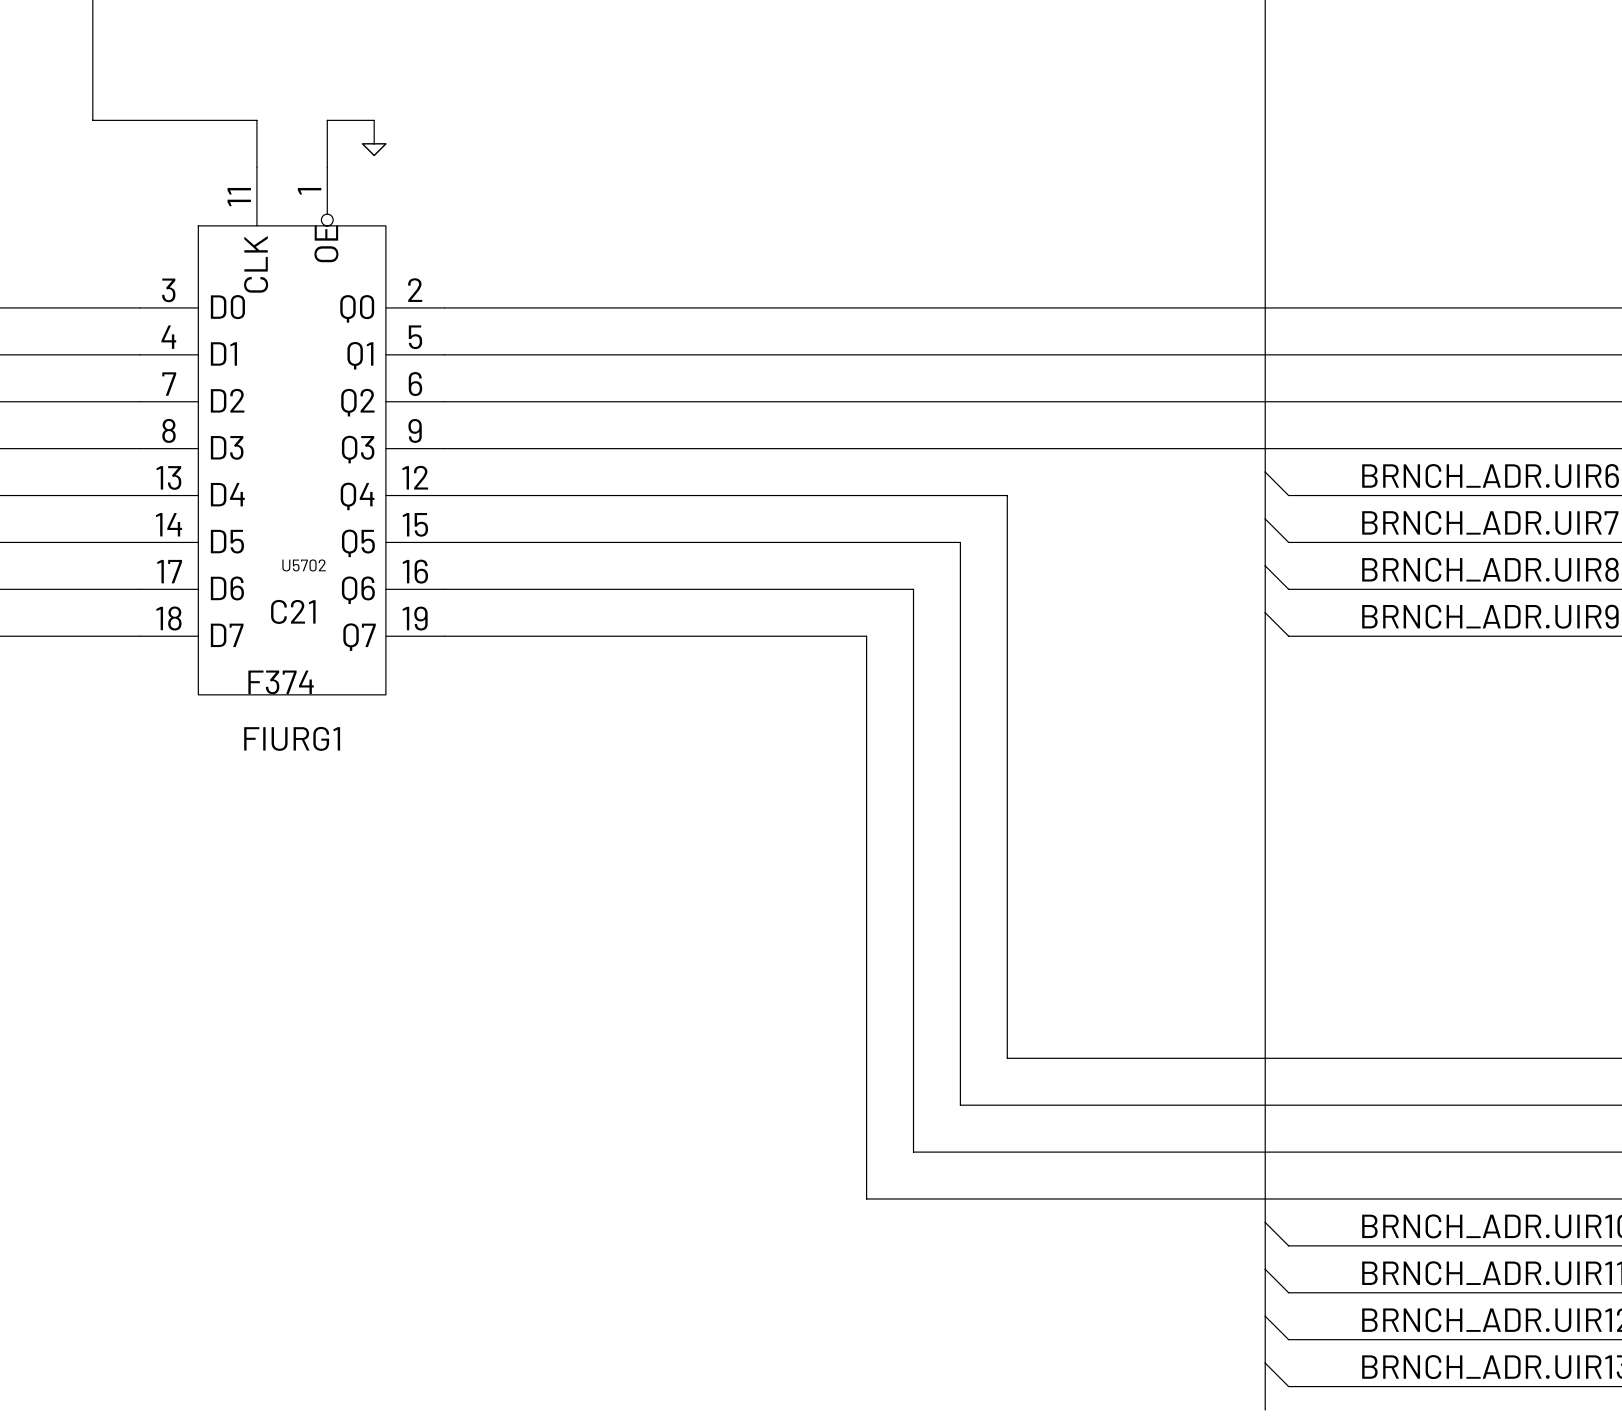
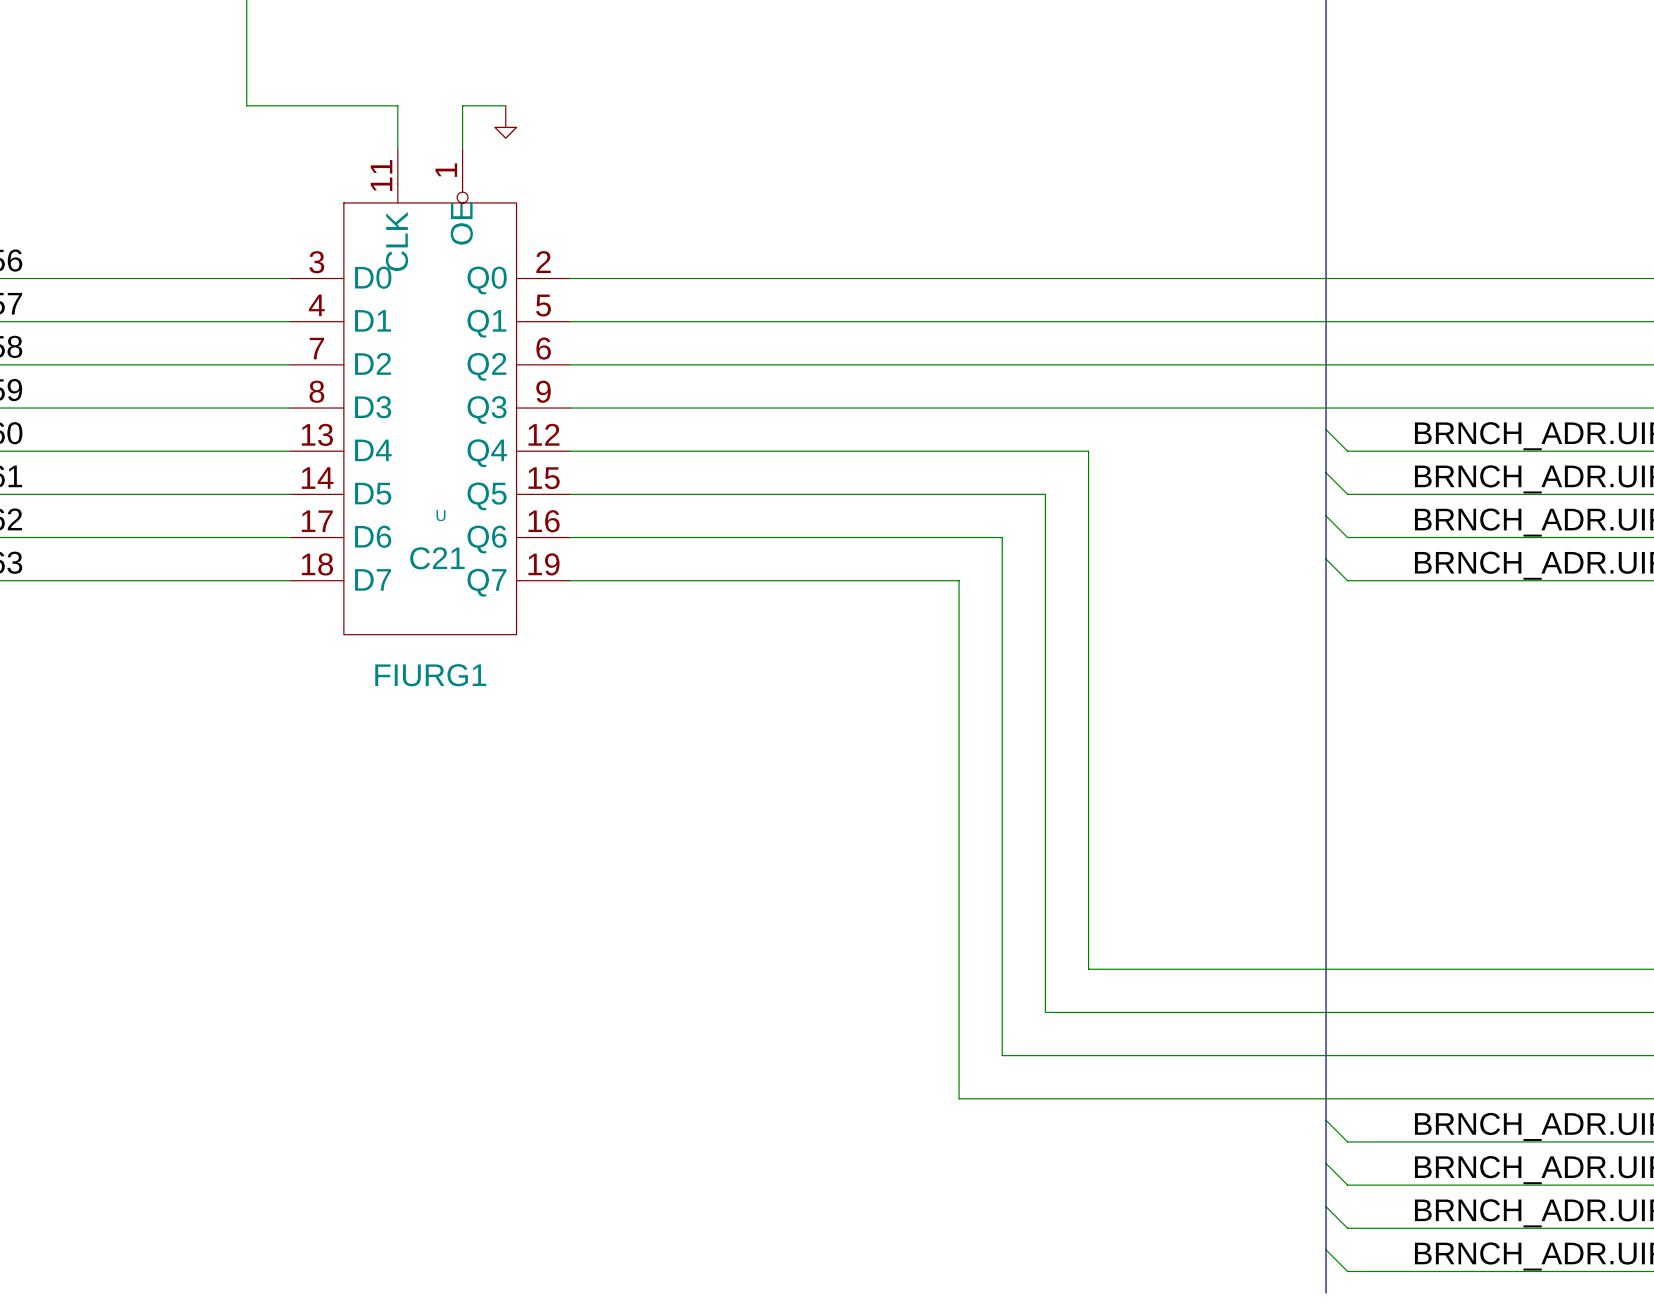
U5702 name: U5702 (304, 565) -> U (441, 515)
U5702 value: F374 (281, 682) -> none

